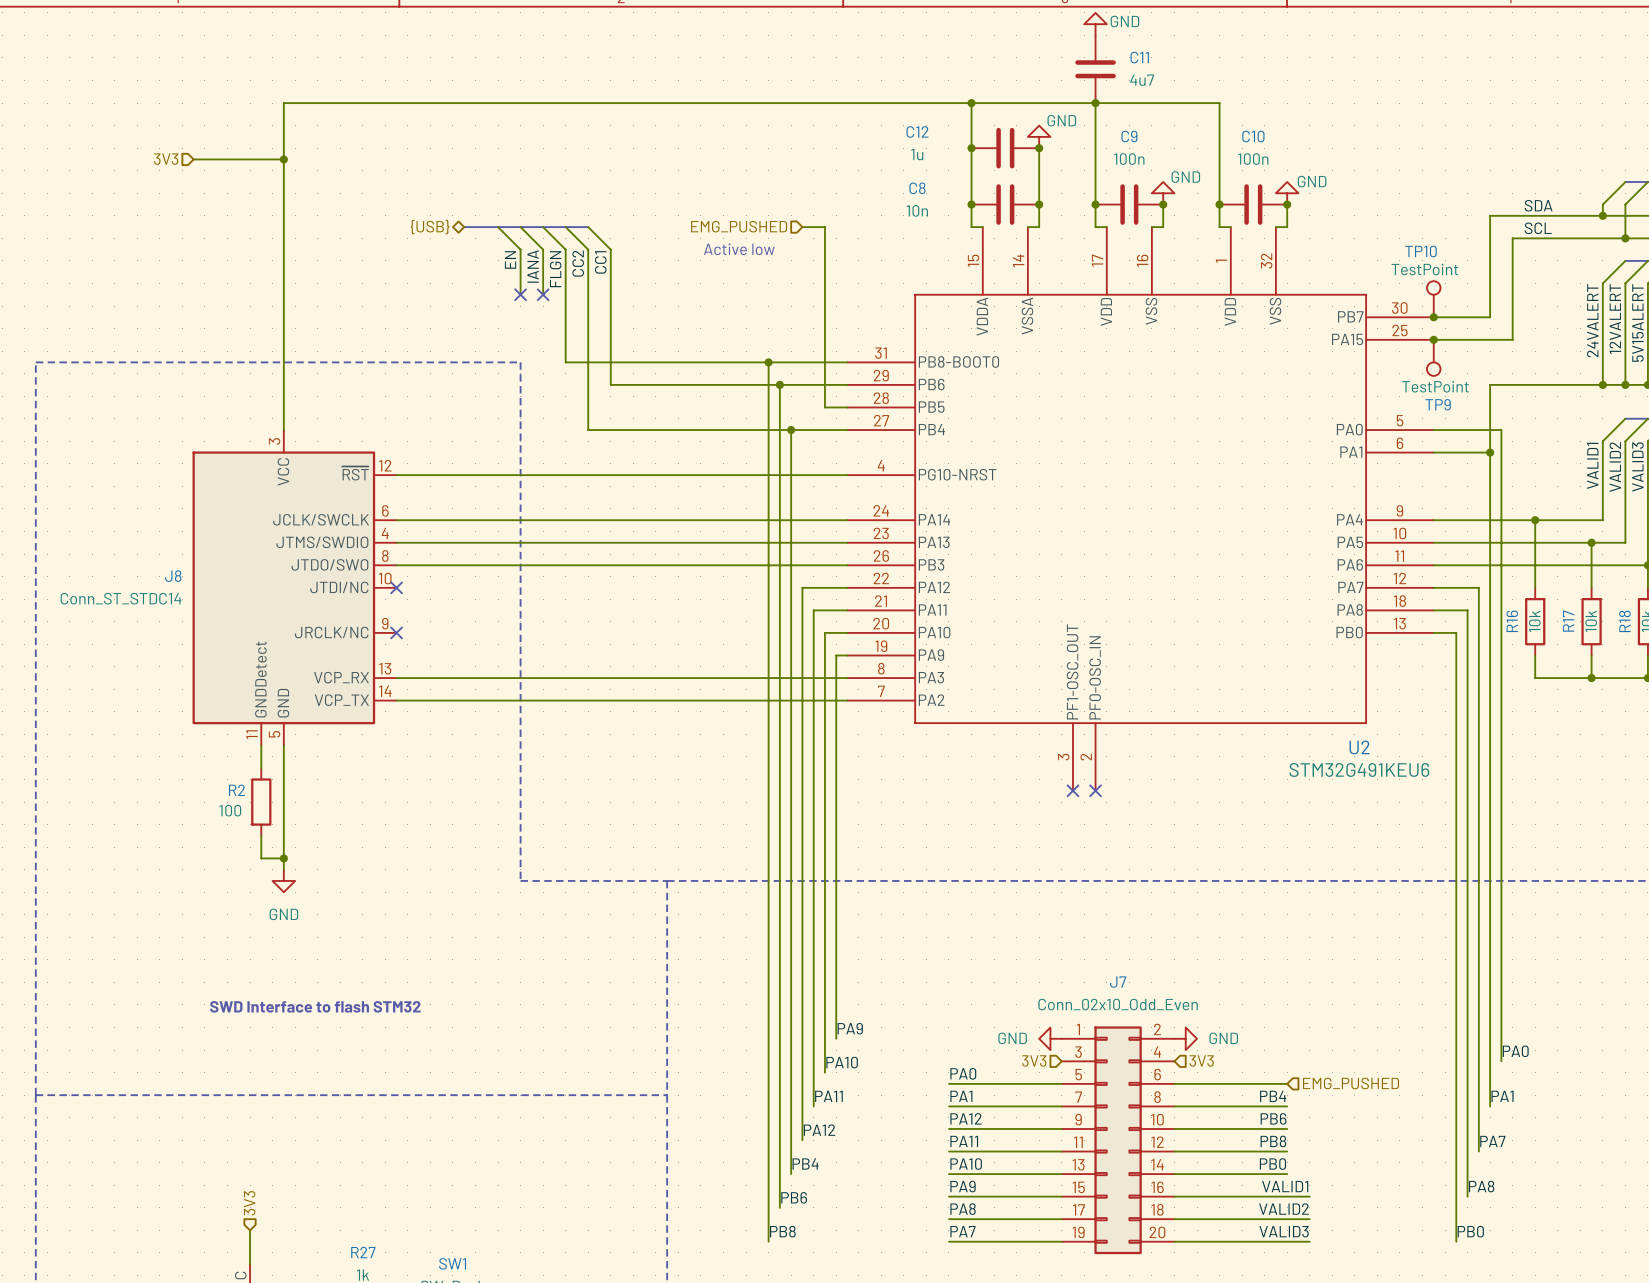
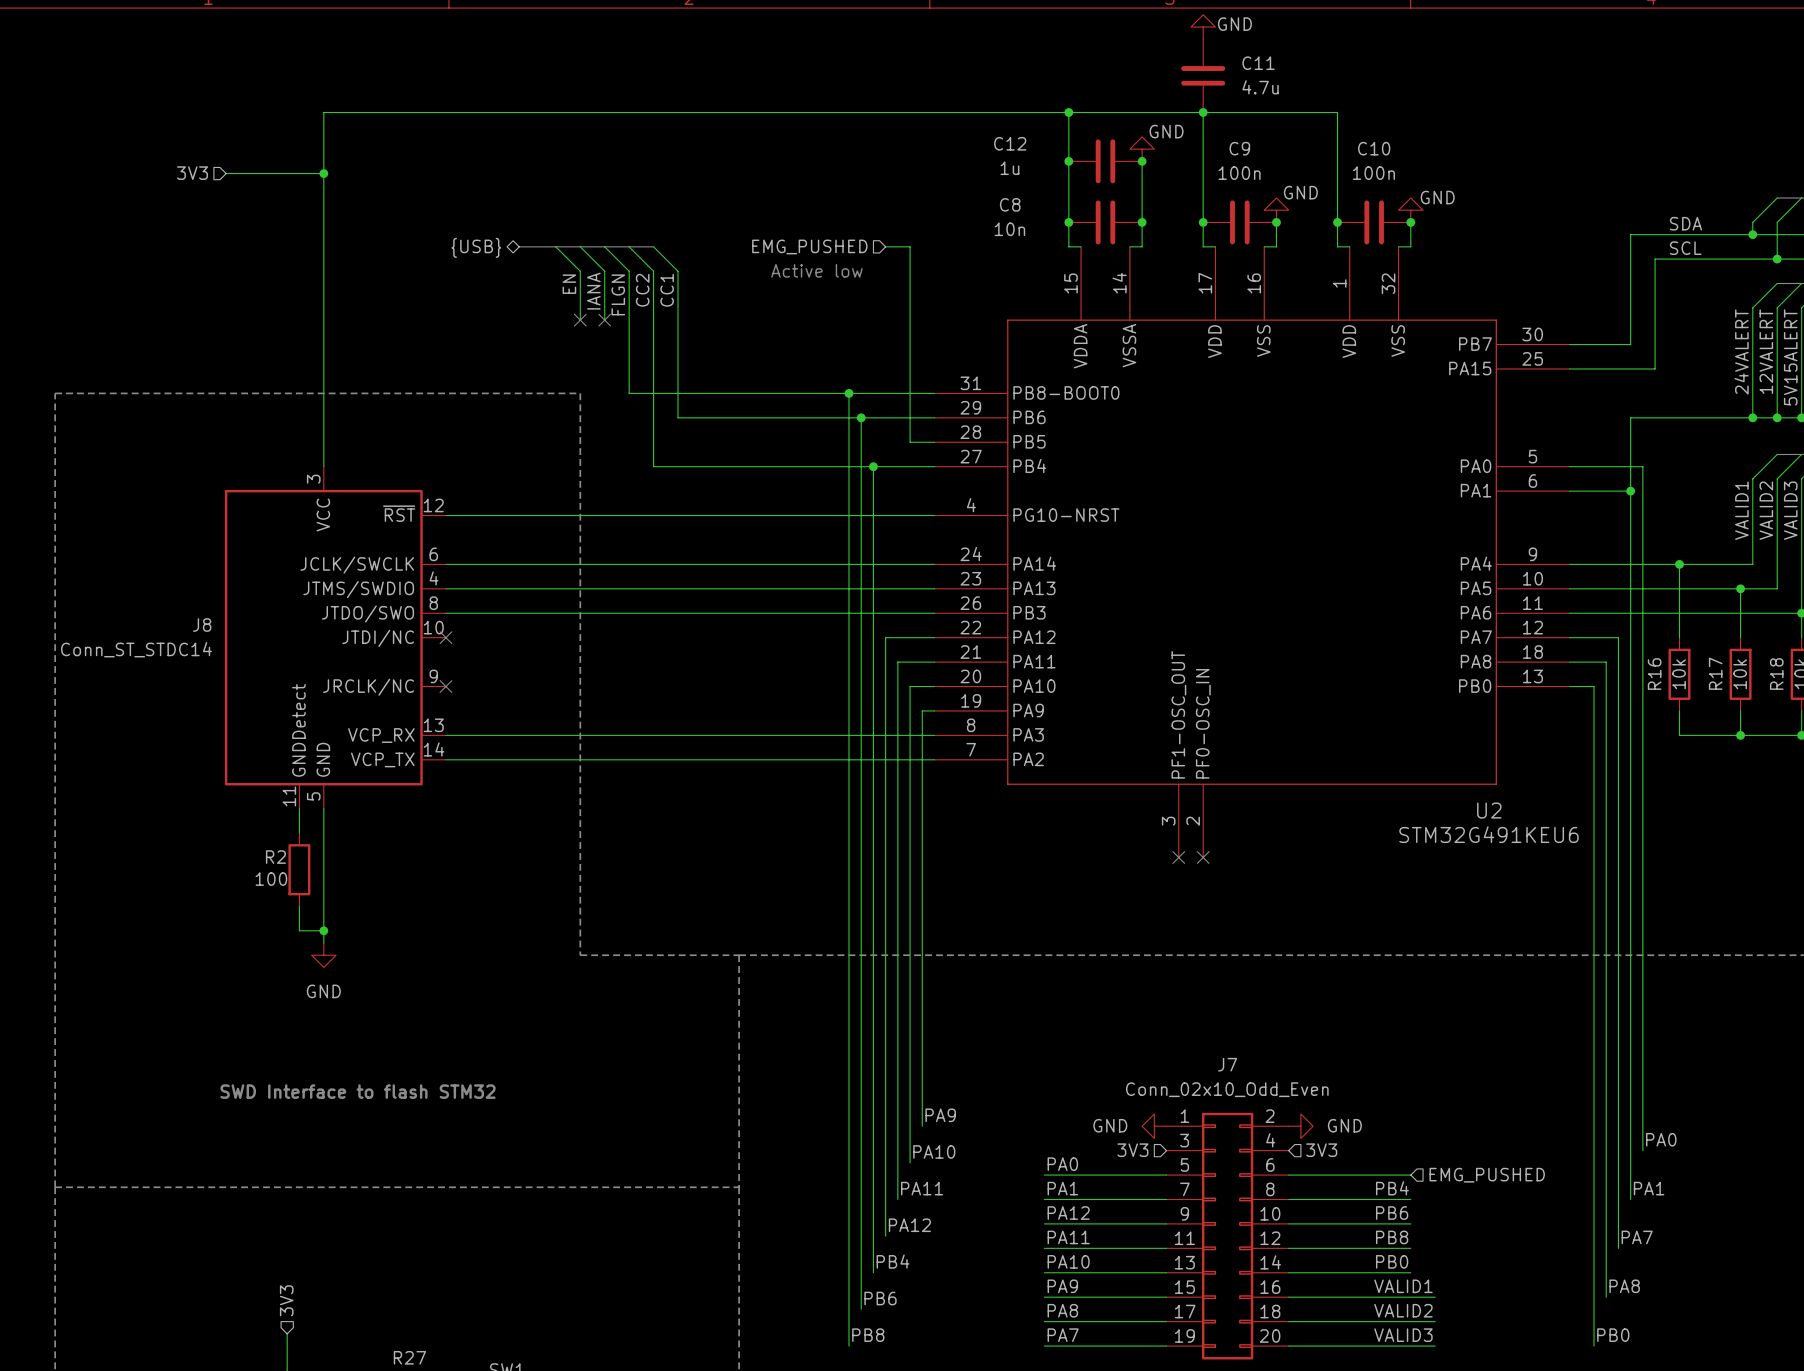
C11 value: 4u7 (1142, 80) -> 4.7u (1260, 87)
TP10: TestPoint (1433, 299) -> none
junction: (1433, 317) -> none
junction: (1433, 339) -> none
TP9: TestPoint (1433, 357) -> none

